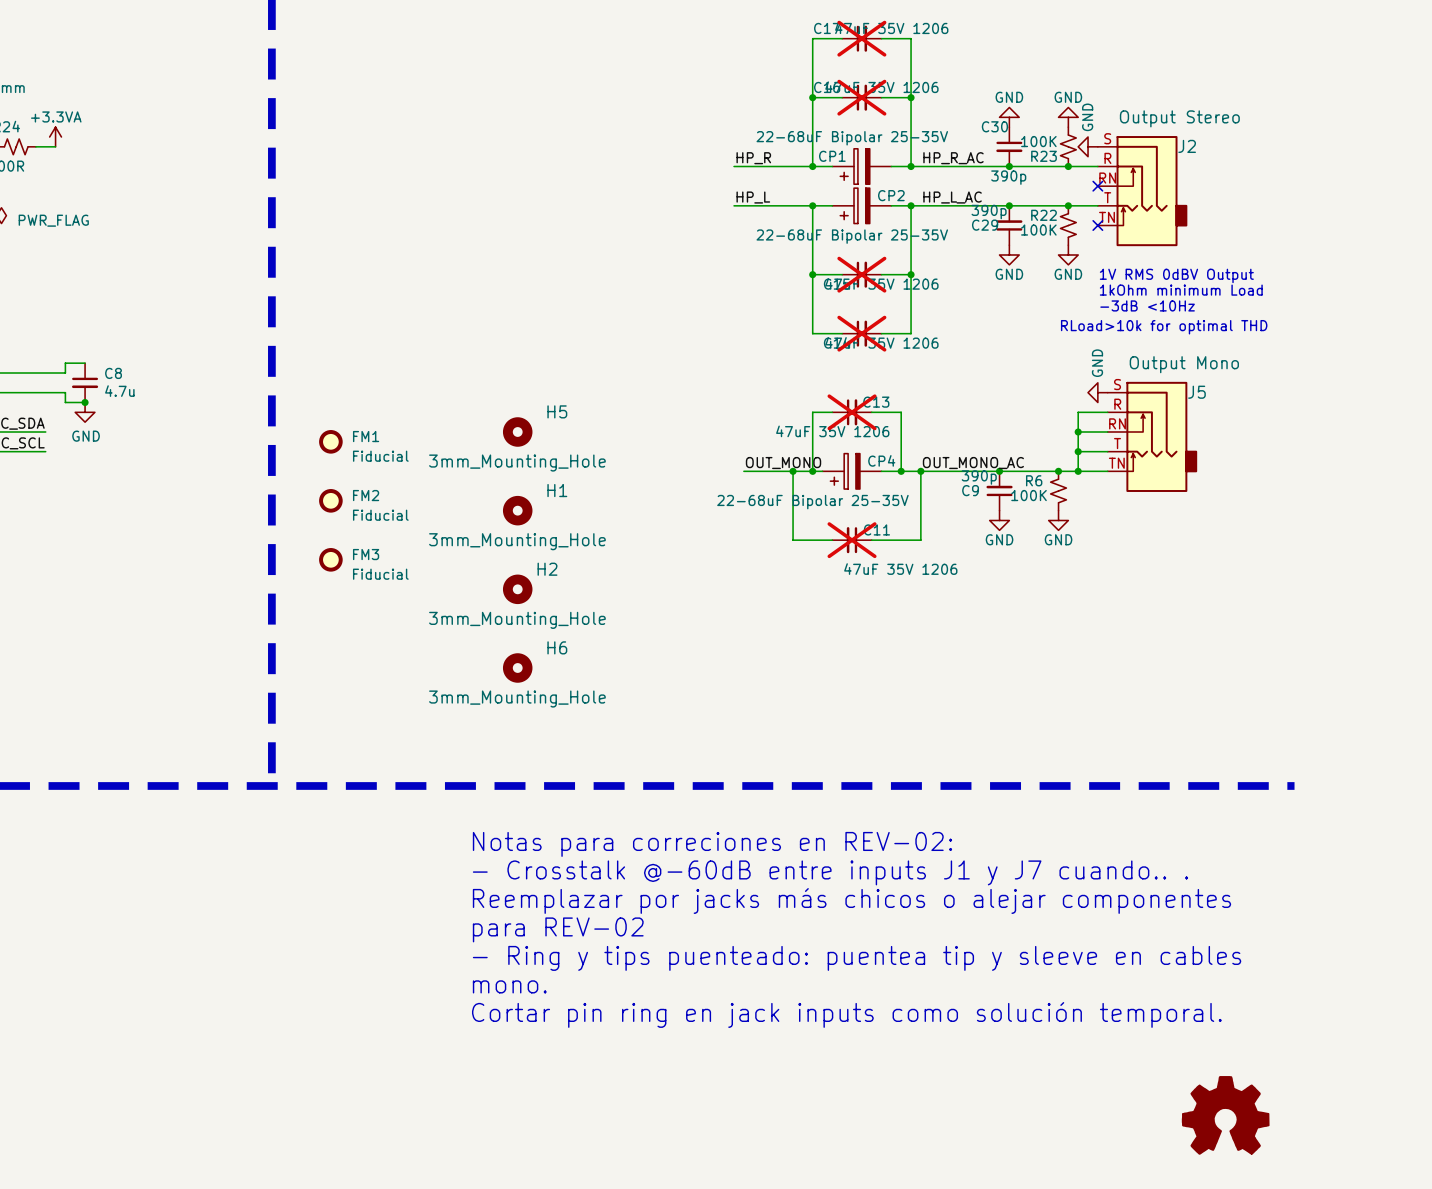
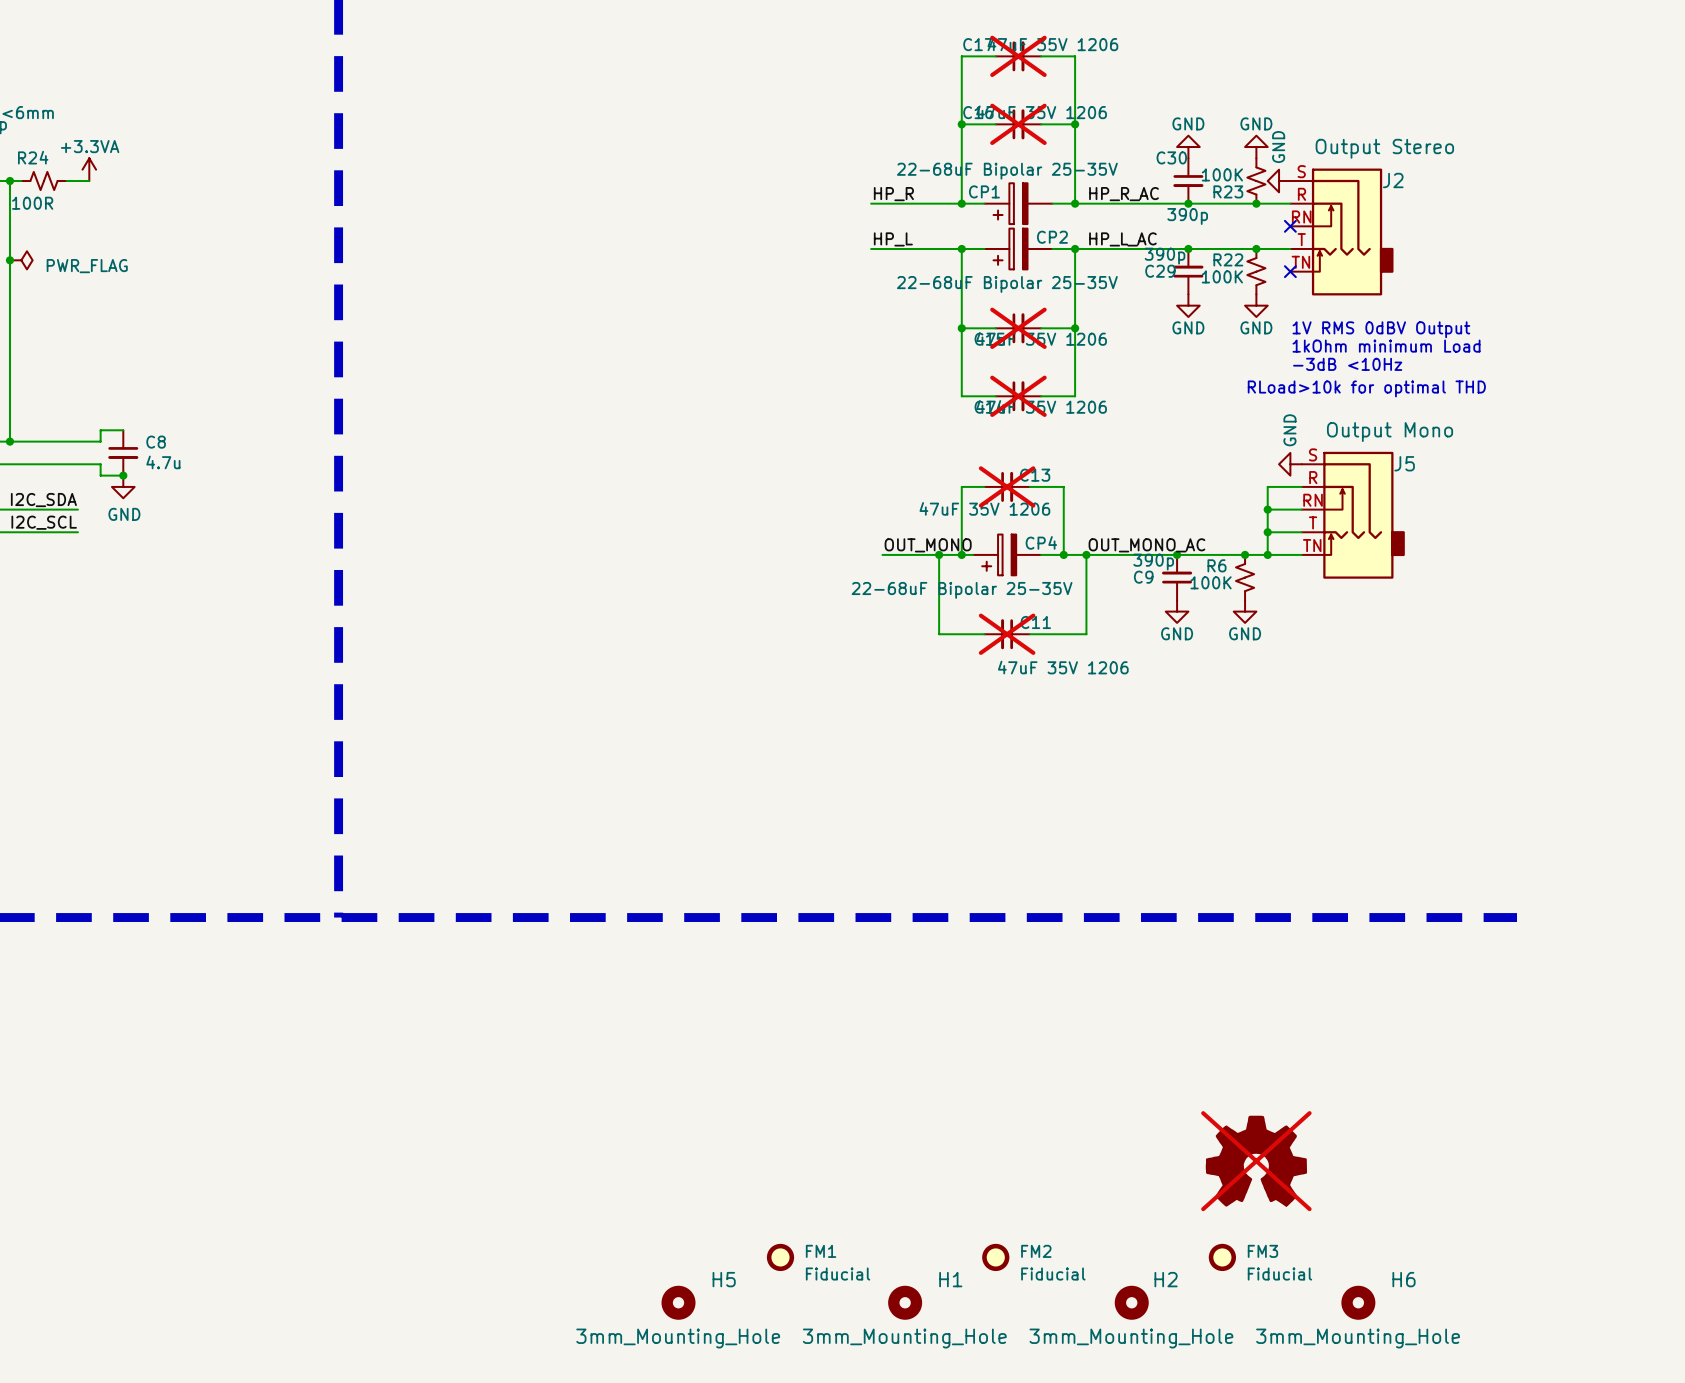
H5 position: (517, 431) -> (678, 1302)
FM1 position: (330, 441) -> (780, 1257)
FM2 position: (330, 500) -> (995, 1257)
H1 position: (517, 510) -> (905, 1302)
FM3 position: (330, 559) -> (1222, 1257)
H2 position: (517, 589) -> (1131, 1302)
H6 position: (517, 667) -> (1358, 1302)
text: Notas para correciones en REV-02: (712, 844) -> none
text: - Crosstalk @-60dB entre inputs J1 y J7 cuando.. . (830, 872) -> none
text: Reemplazar por jacks más chicos o alejar componentes (851, 900) -> none
text: para REV-02 (558, 929) -> none
text: - Ring y tips puenteado: puentea tip y sleeve en cables (857, 958) -> none
text: mono. (509, 986) -> none
part: none -> (1256, 1161)
text: Cortar pin ring en jack inputs como solución temporal. (846, 1014) -> none
part: (1225, 1115) -> none

